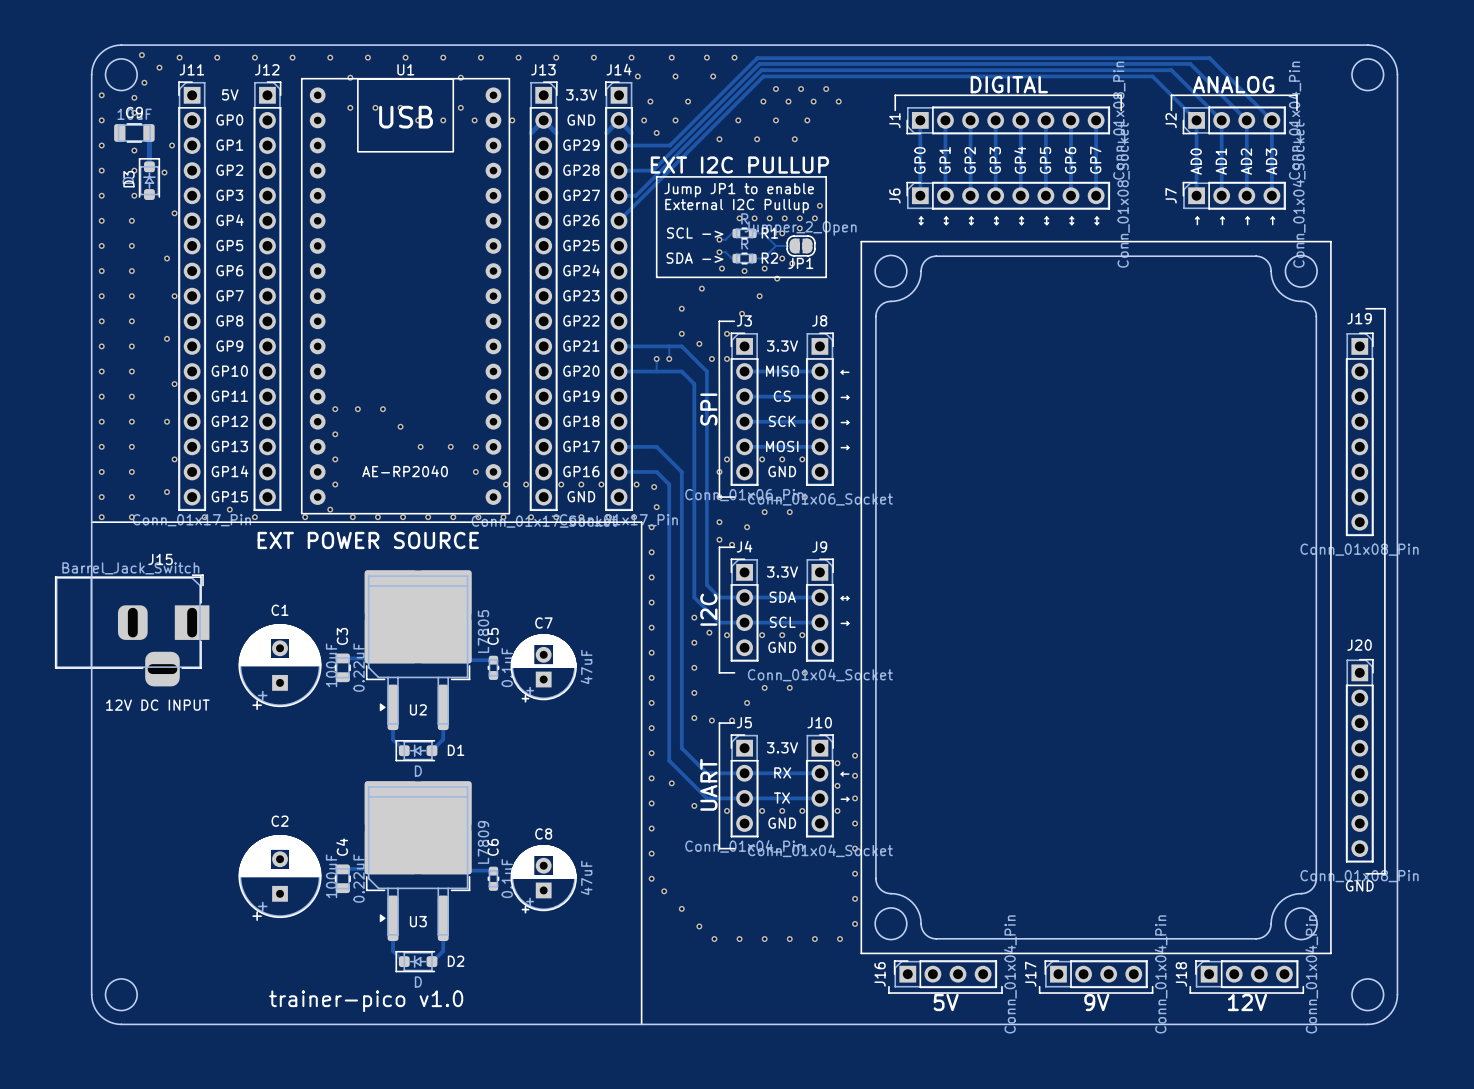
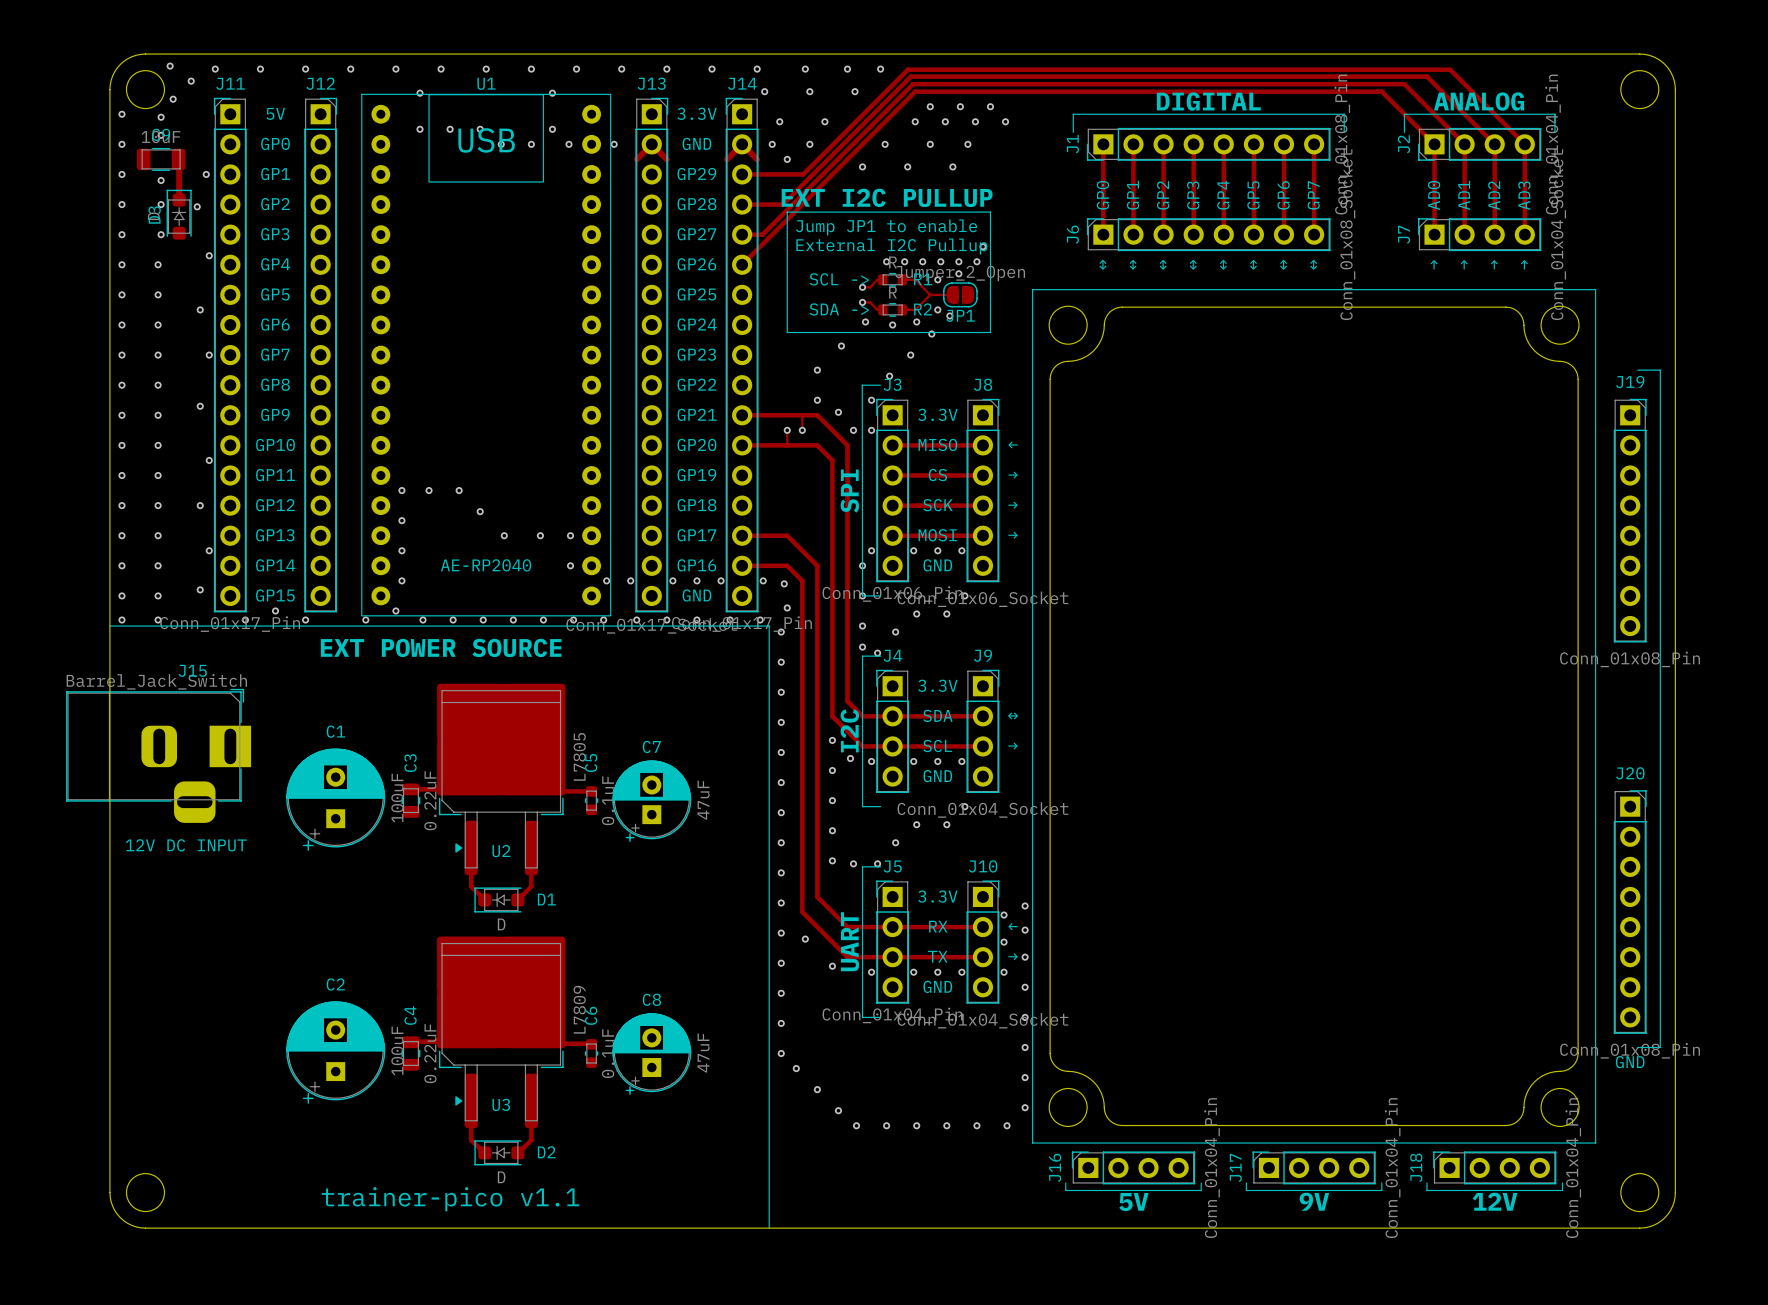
text: trainer-pico v1.0 (366, 1001) -> trainer-pico v1.1 (450, 1199)

